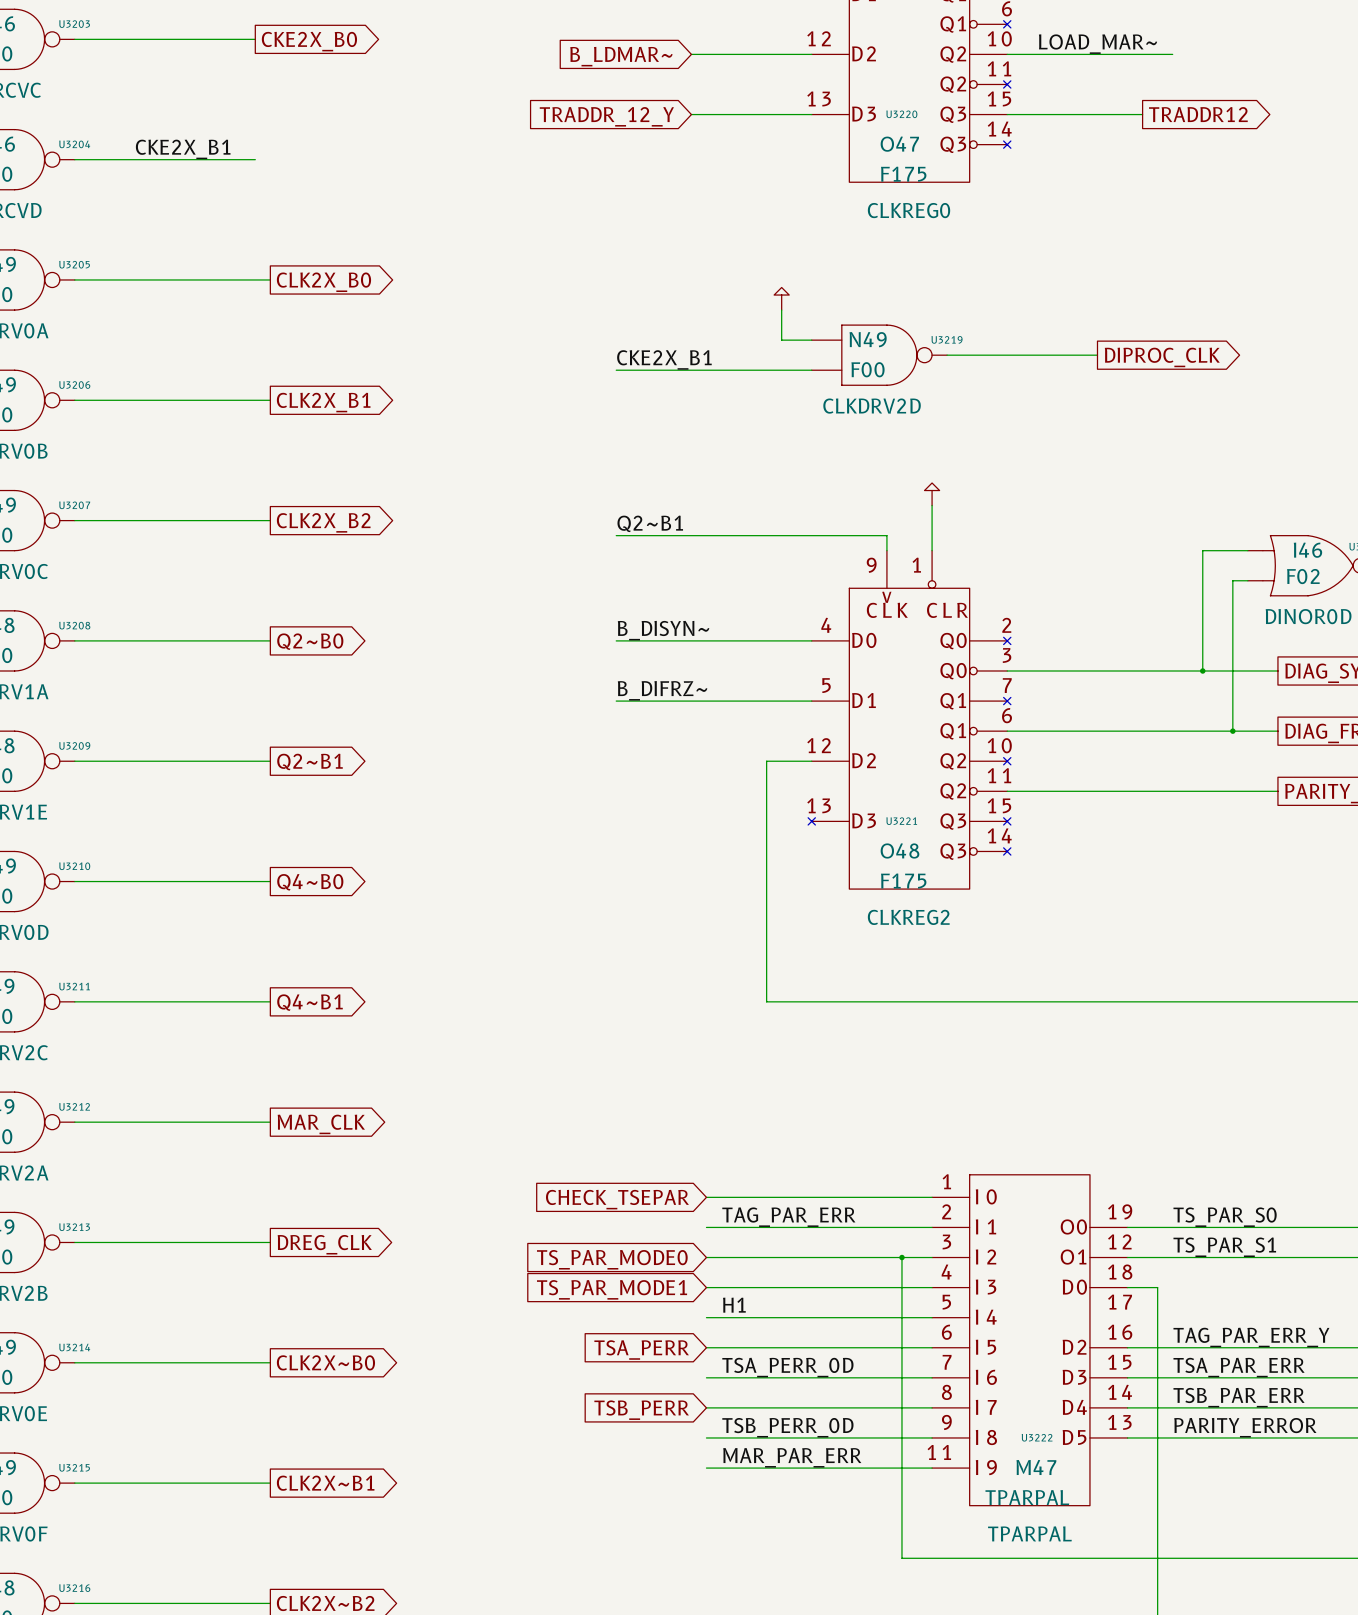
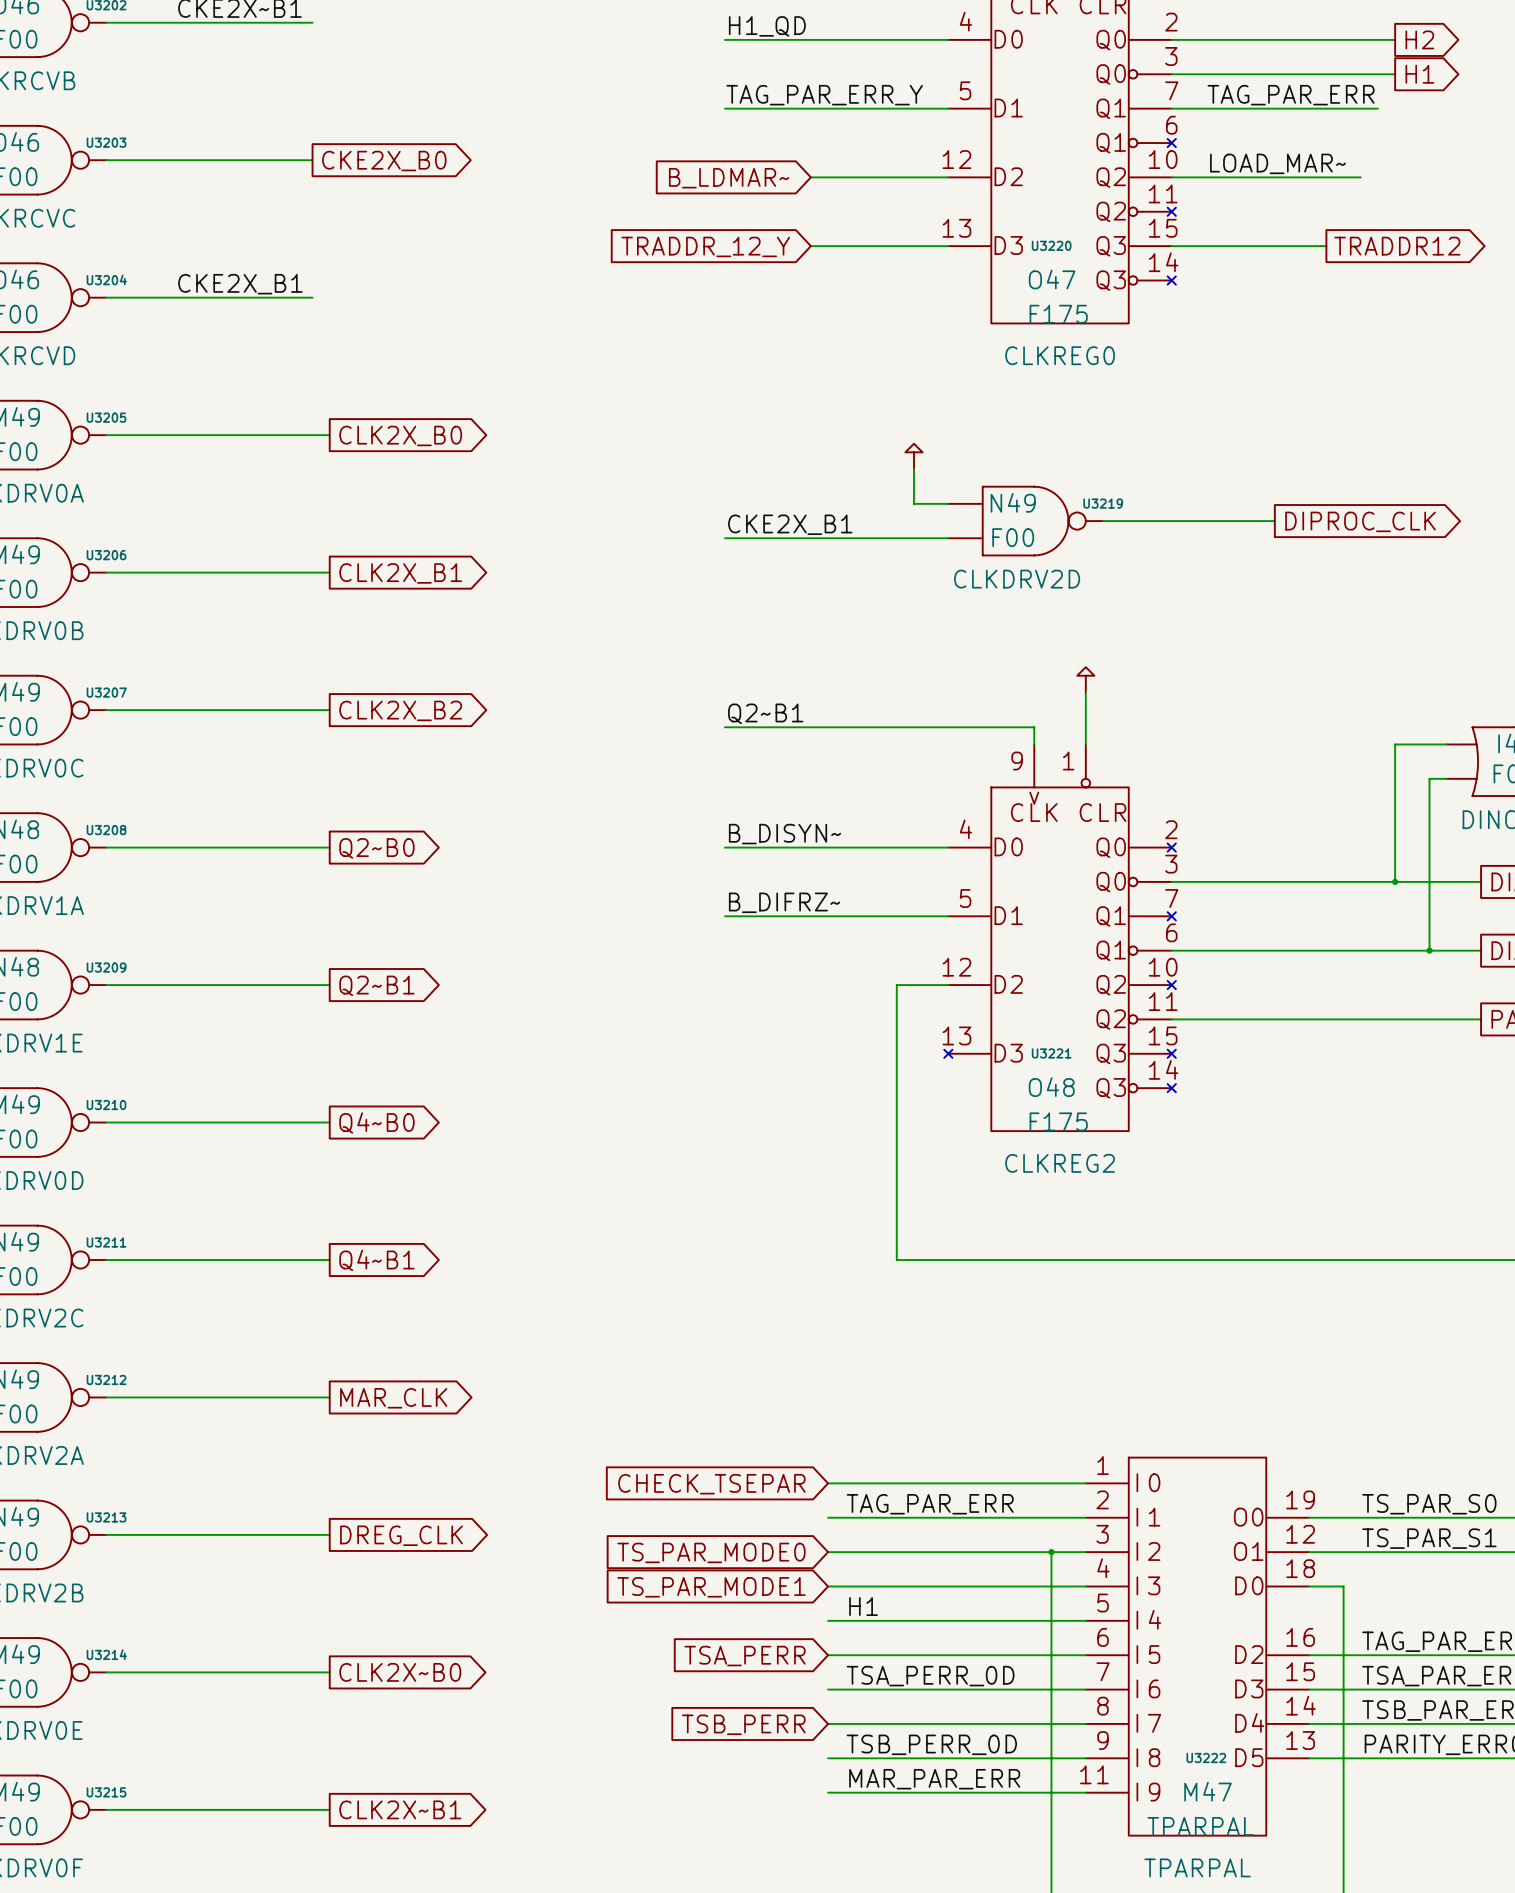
U3222 text: 1 (1112, 1302) -> none
U3222 text: 7 (1127, 1302) -> none

